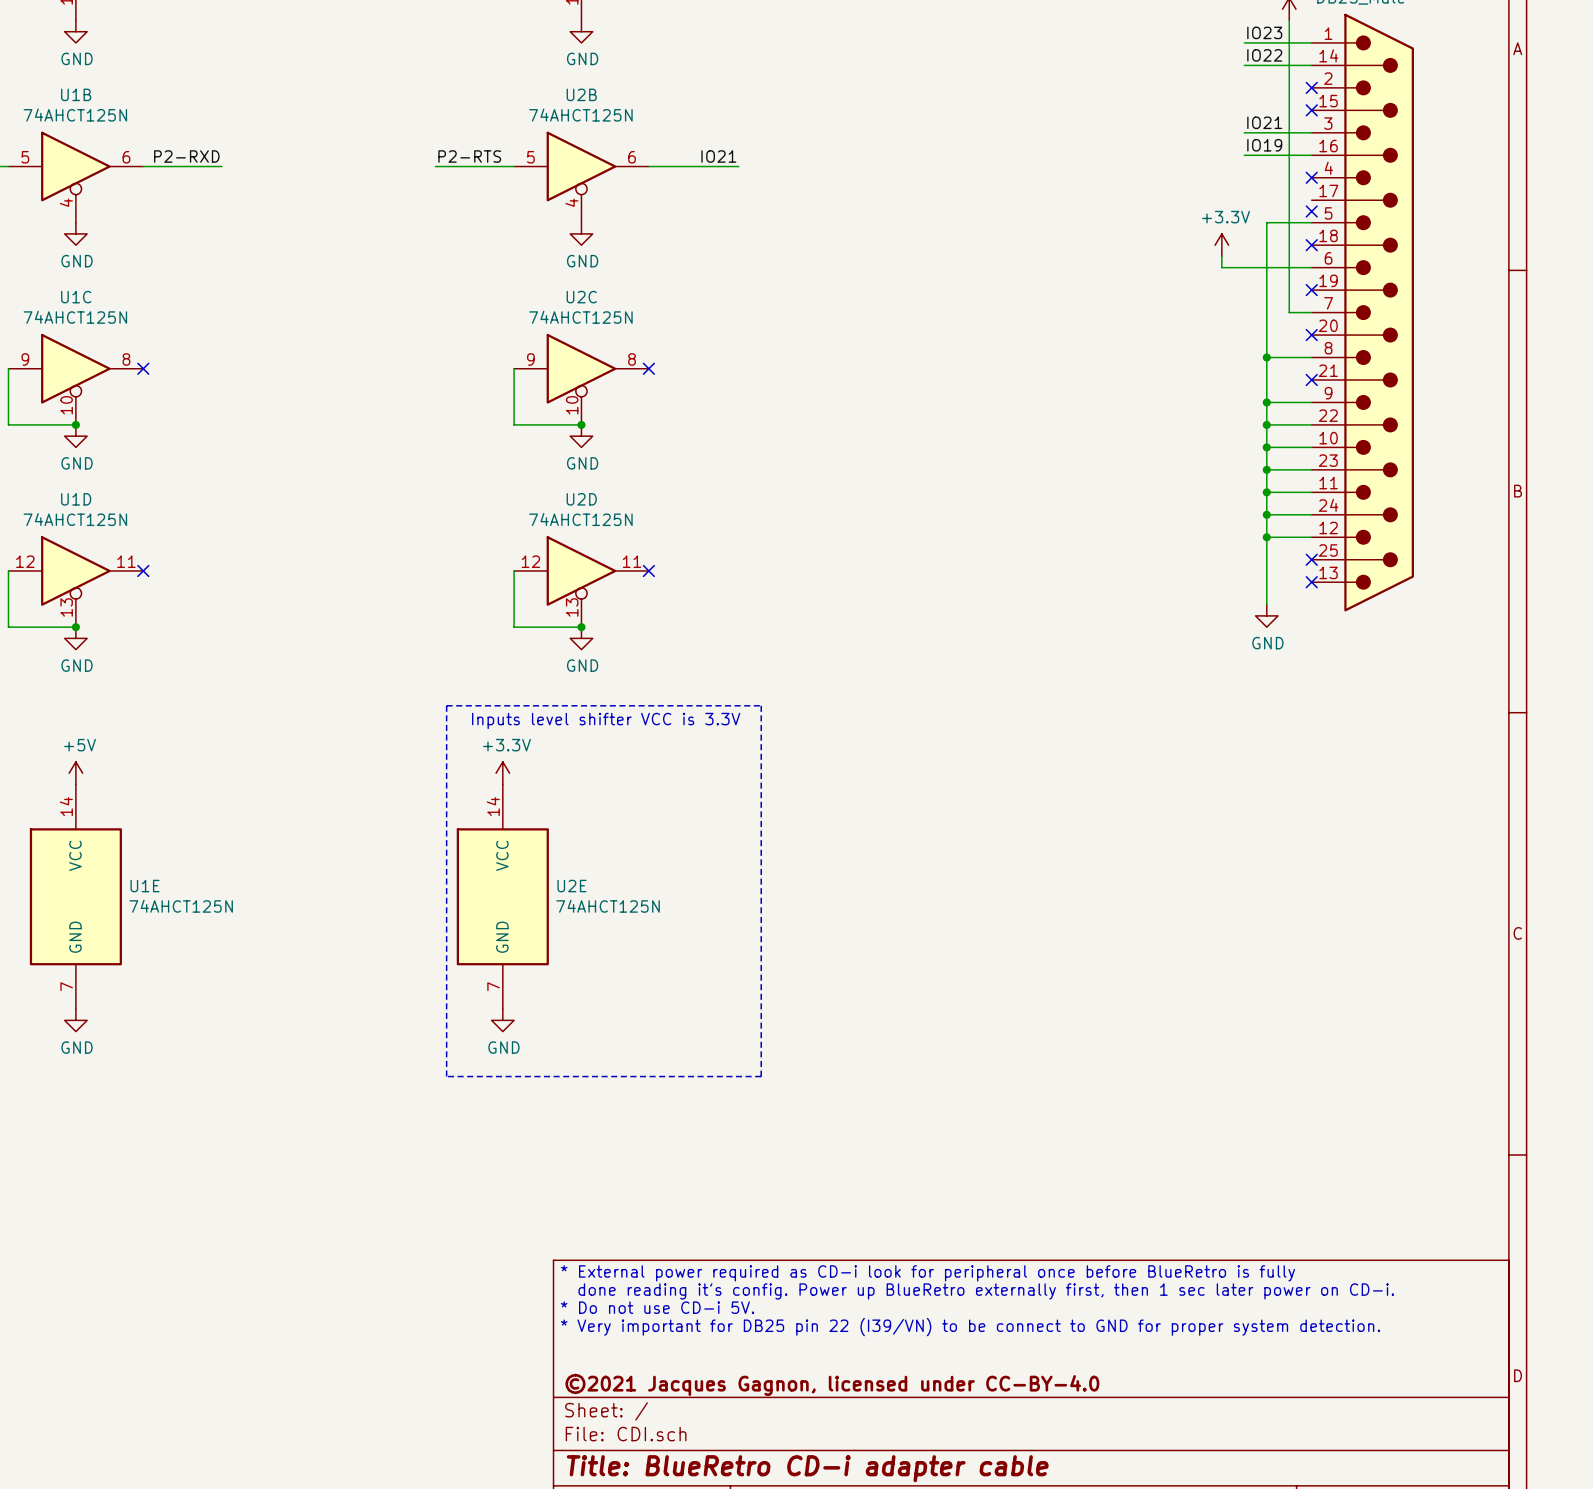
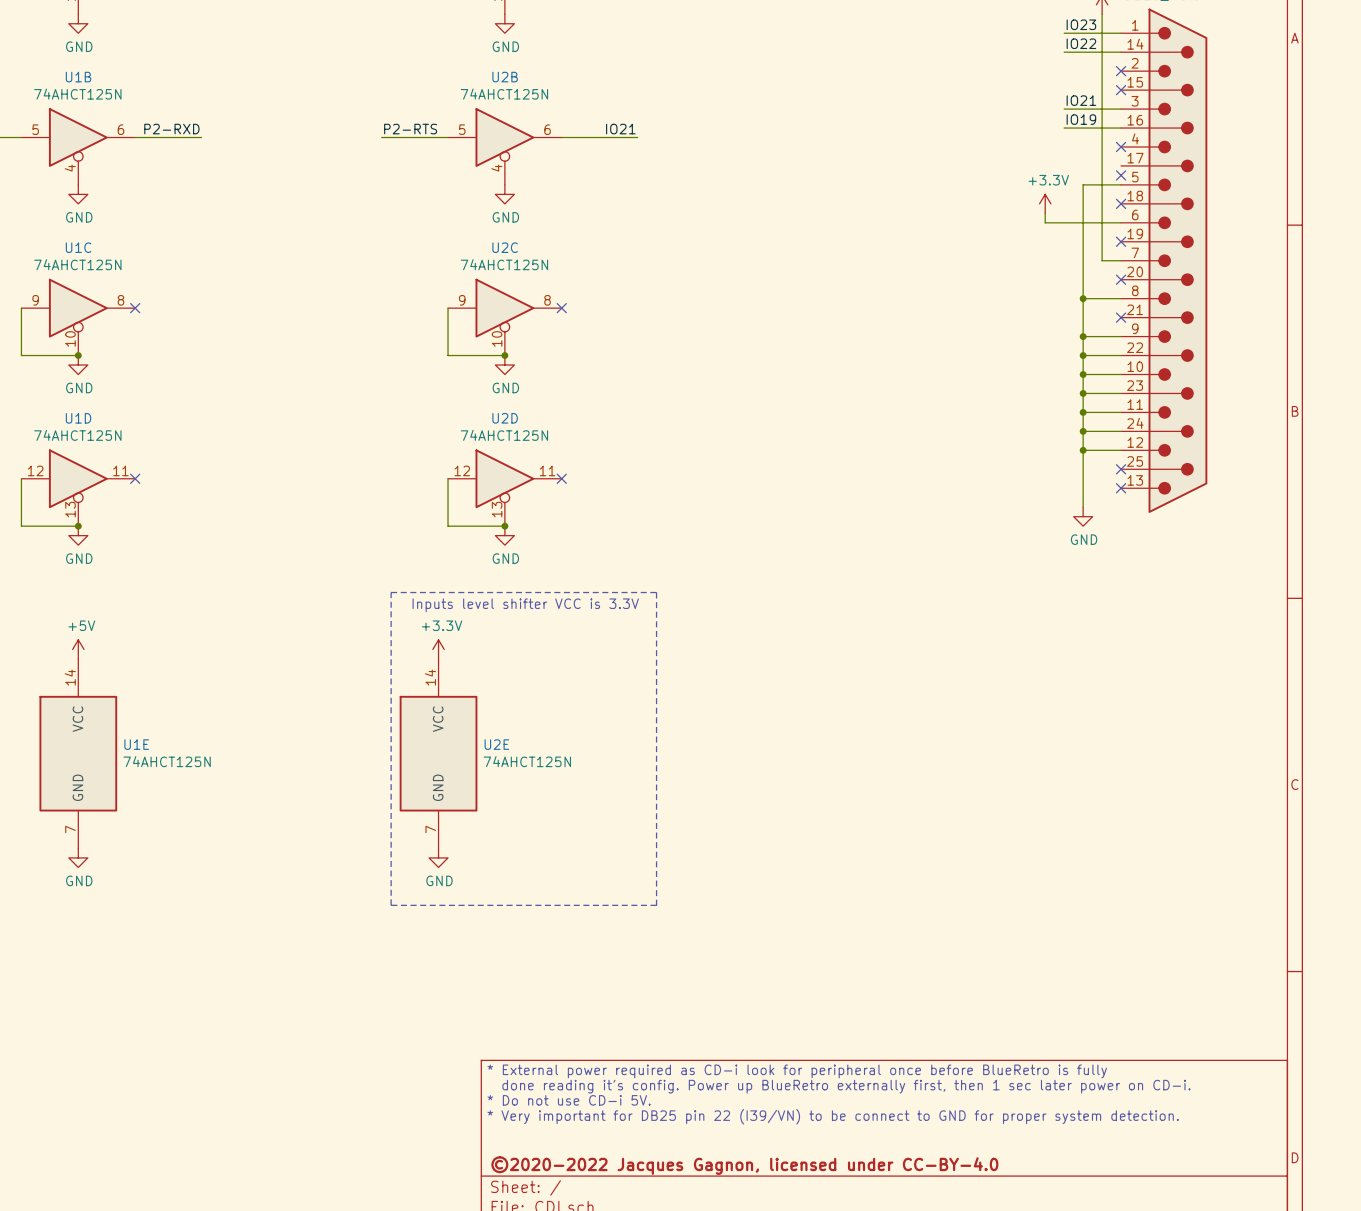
title block: ©2021 Jacques Gagnon, licensed under CC-BY-4.0 (832, 1384) -> ©2020-2022 Jacques Gagnon, licensed under CC-BY-4.0 (744, 1165)

